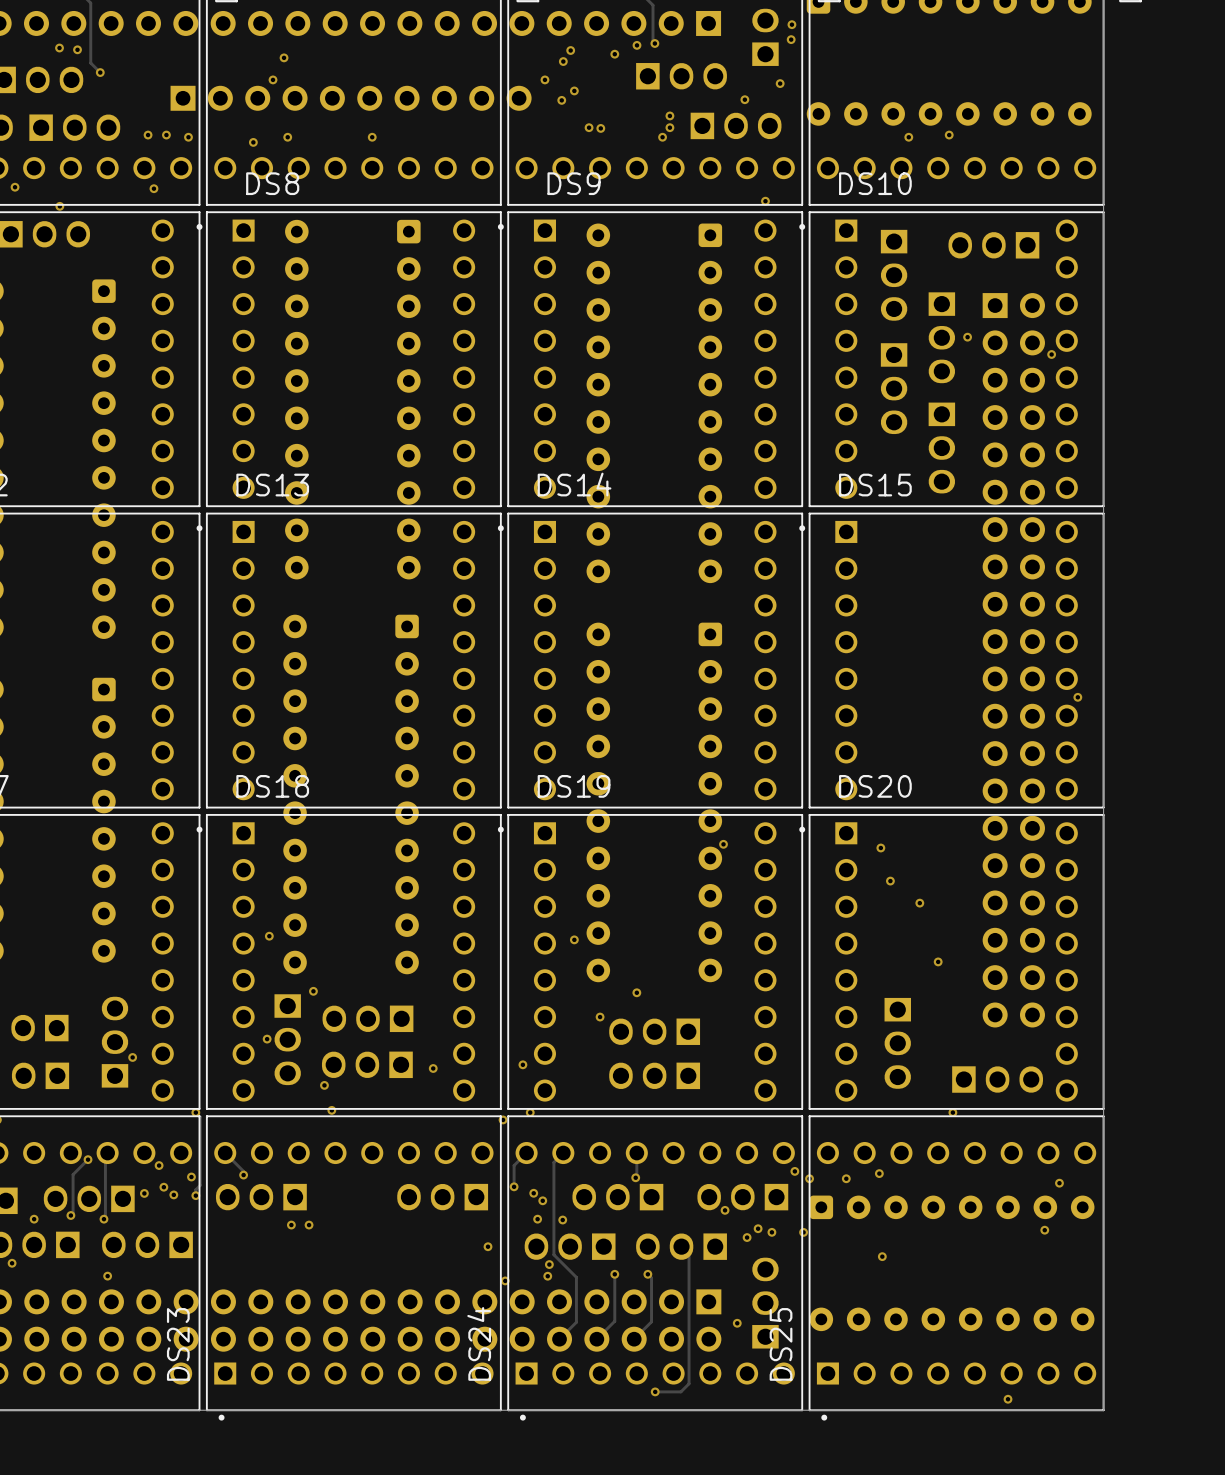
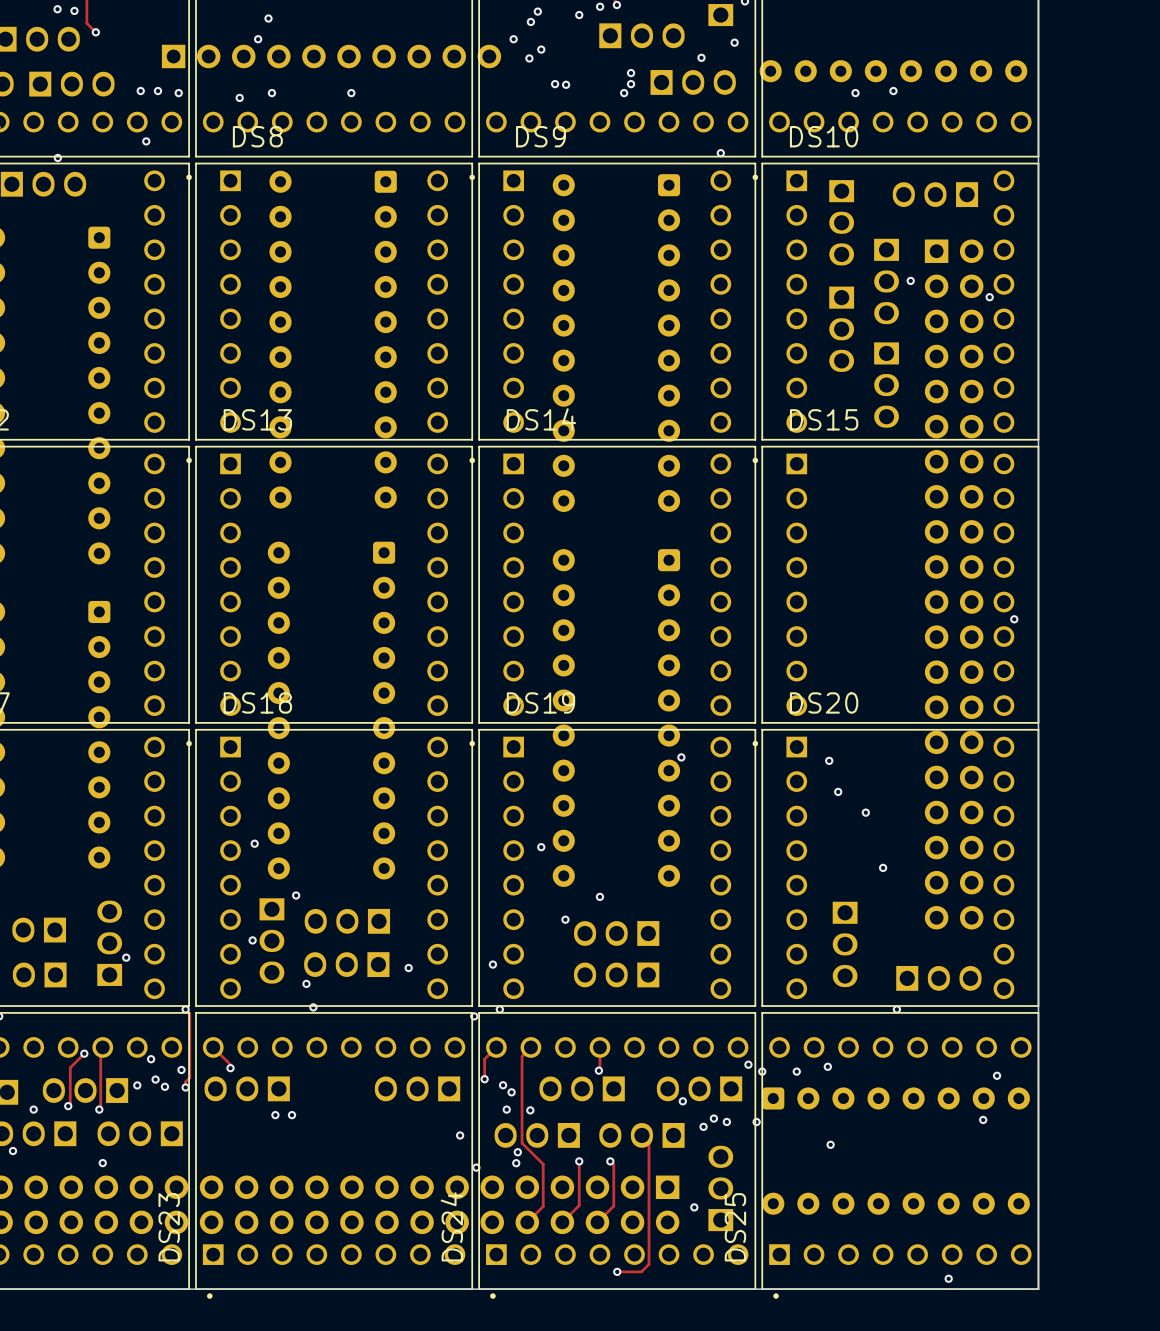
via: (15, 187) -> none

